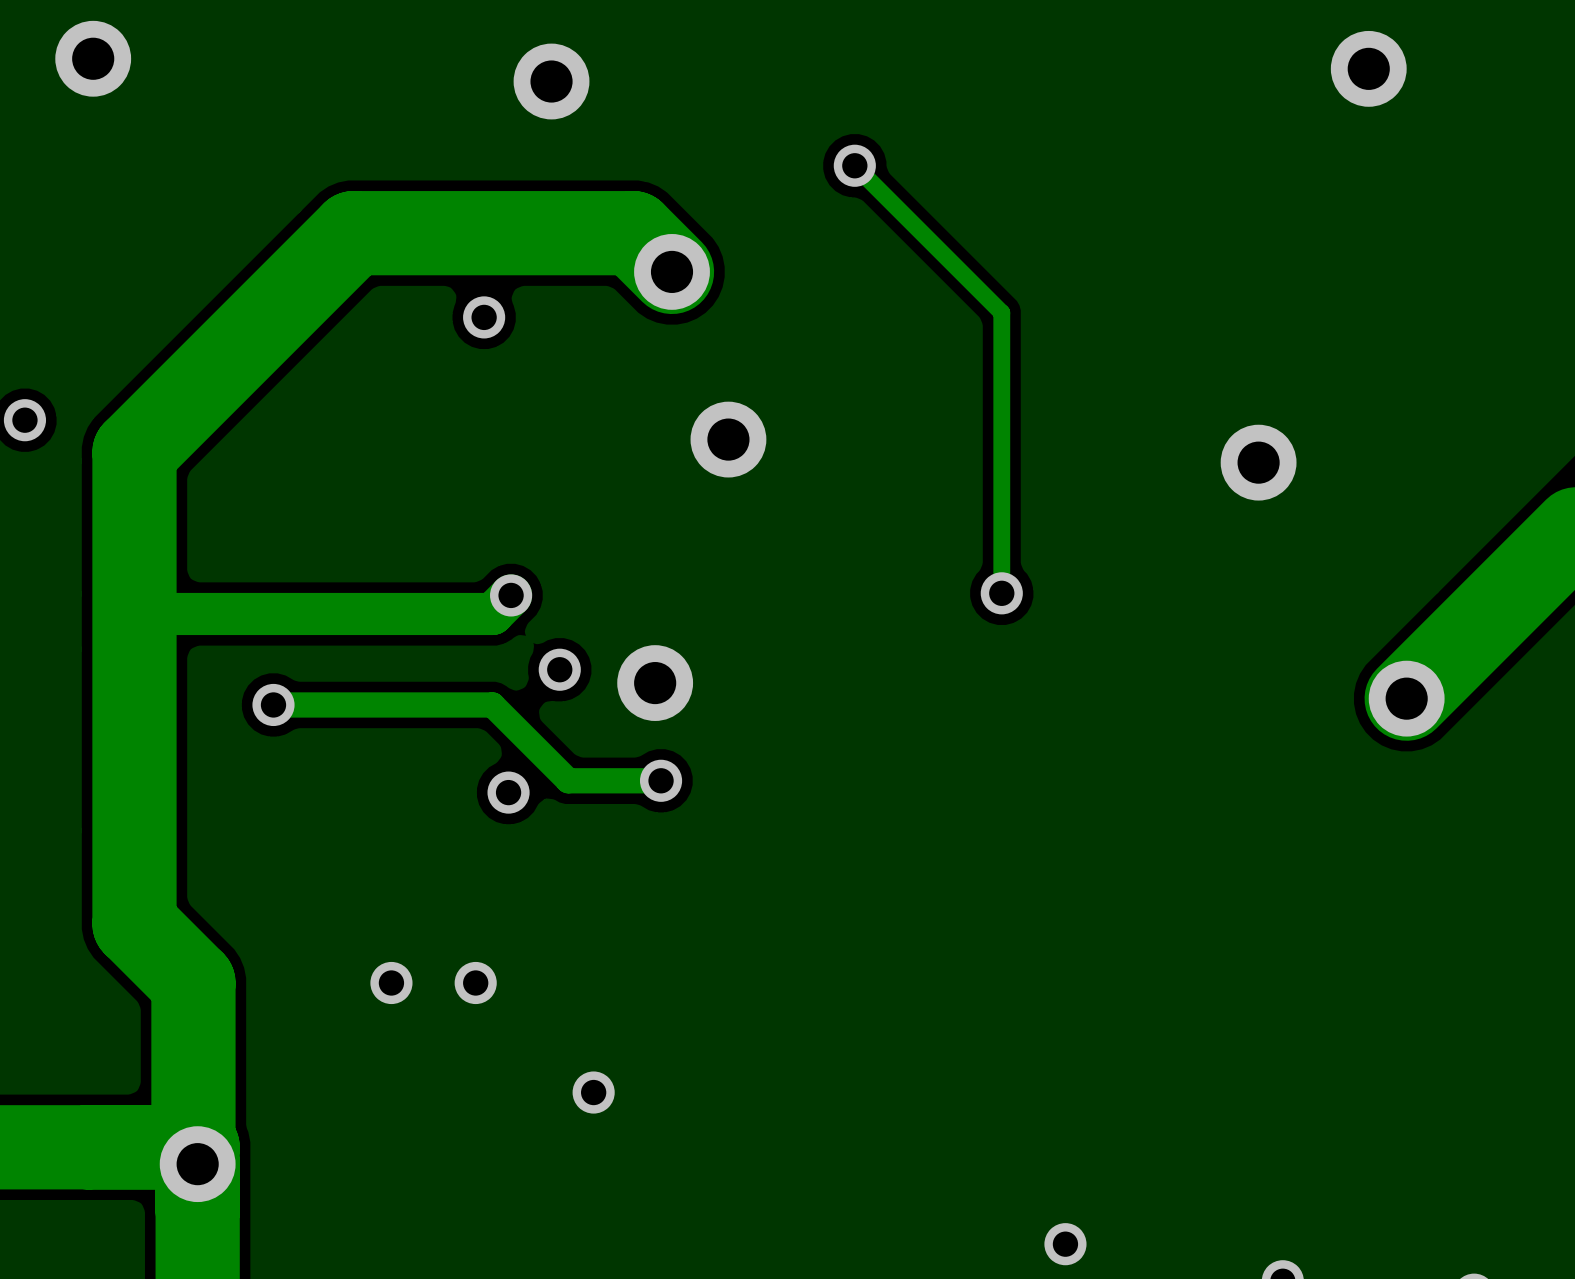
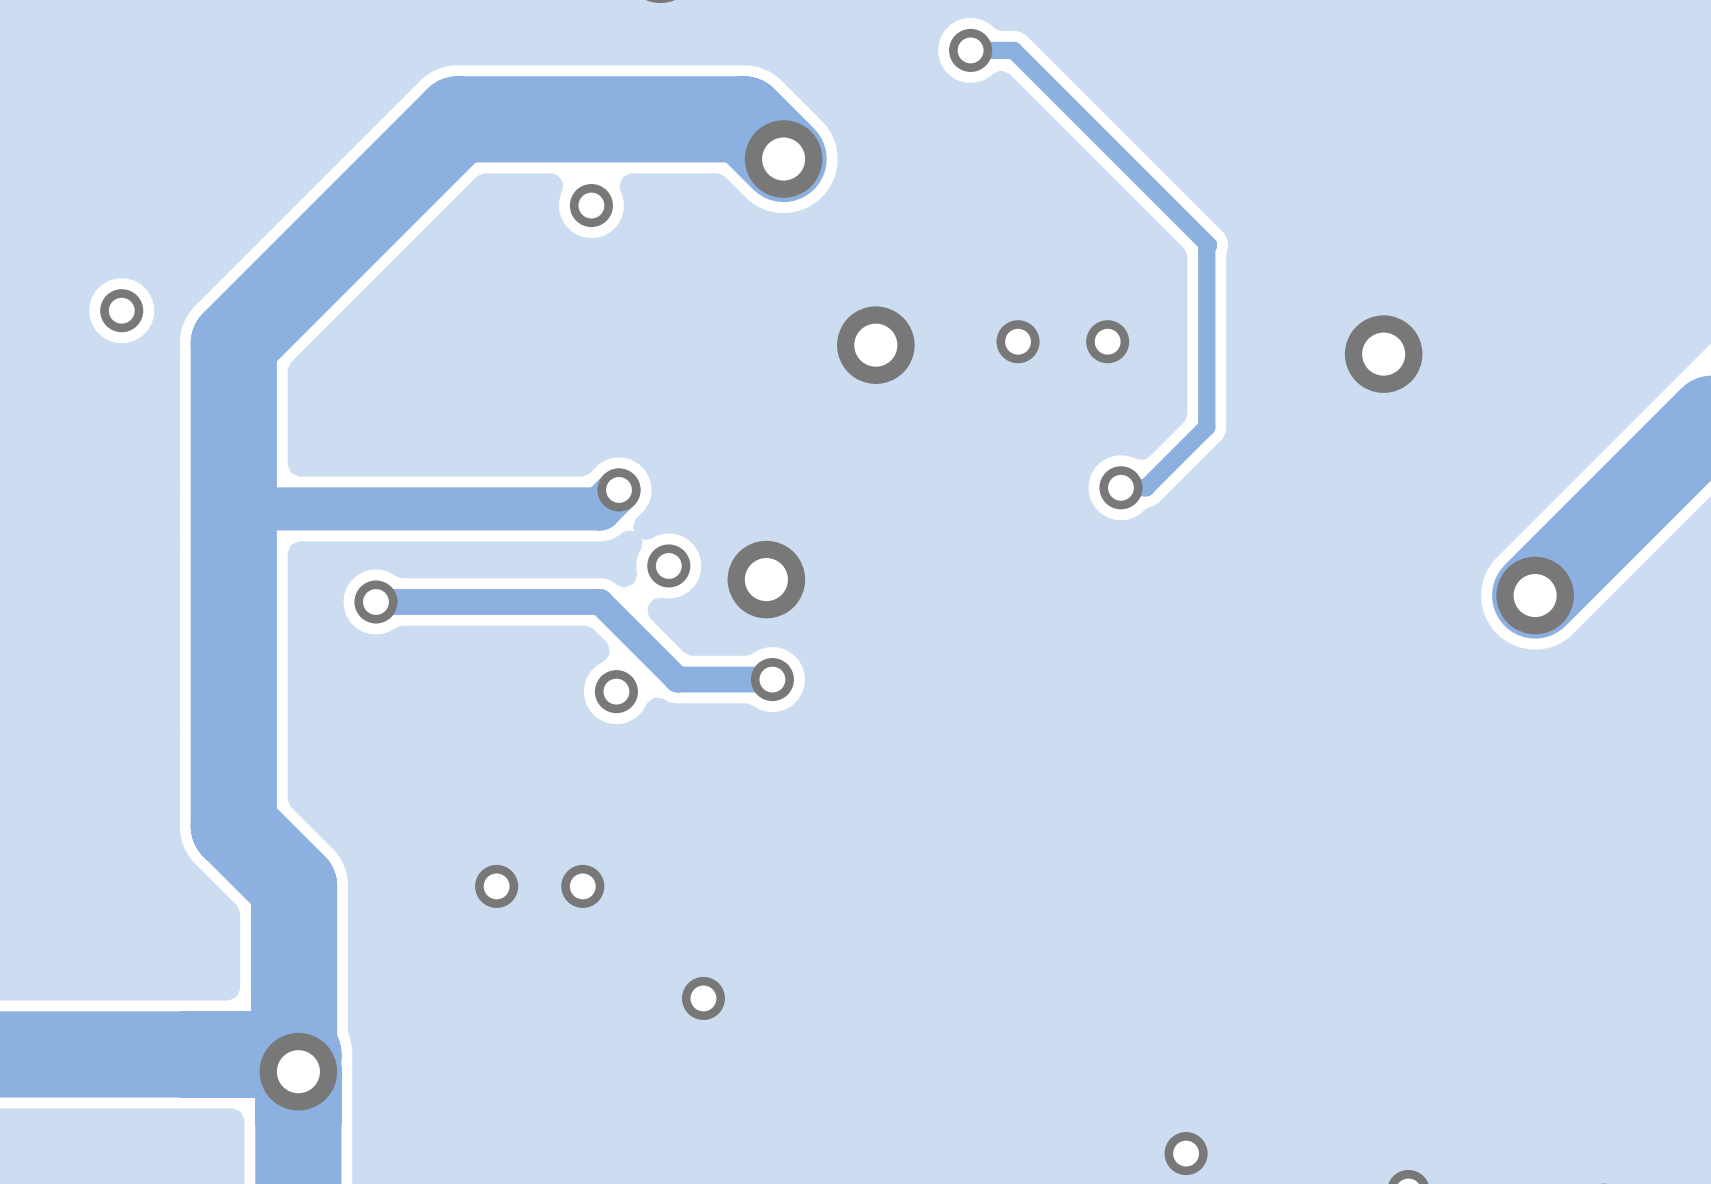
track: (854, 165) (1001, 312) (1001, 593) -> (970, 50) (1013, 50) (1208, 245) (1206, 246) (1206, 427) (1146, 487) (1120, 487)
via position: (728, 439) -> (875, 345)
via: none -> (1018, 341)
via: none -> (1107, 341)

